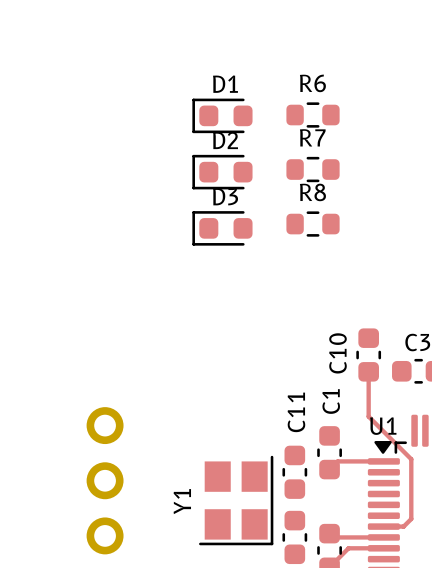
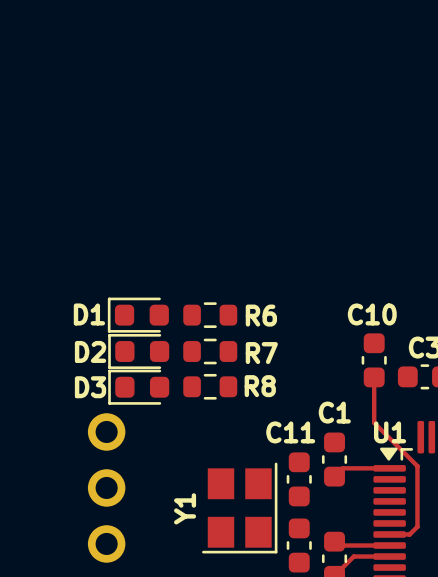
R6 name position: R6 (312, 83) -> R6 (261, 315)
D1 name position: D1 (225, 84) -> D1 (89, 314)
D1 position: (222, 115) -> (138, 315)
R6 position: (313, 115) -> (210, 315)
R7 name position: R7 (312, 137) -> R7 (261, 353)
D2 name position: D2 (225, 140) -> D2 (90, 351)
R7 position: (313, 169) -> (210, 351)
D2 position: (222, 172) -> (138, 351)
R8 name position: R8 (312, 192) -> R8 (260, 386)
D3 name position: D3 (225, 196) -> D3 (90, 387)
R8 position: (313, 224) -> (210, 386)
D3 position: (222, 228) -> (138, 387)
C10 name rotation: 0° (337, 353) -> 90° clockwise (372, 314)
C1 name rotation: 0° (331, 401) -> 90° clockwise (334, 412)
C11 name rotation: 0° (296, 412) -> 90° clockwise (290, 432)

